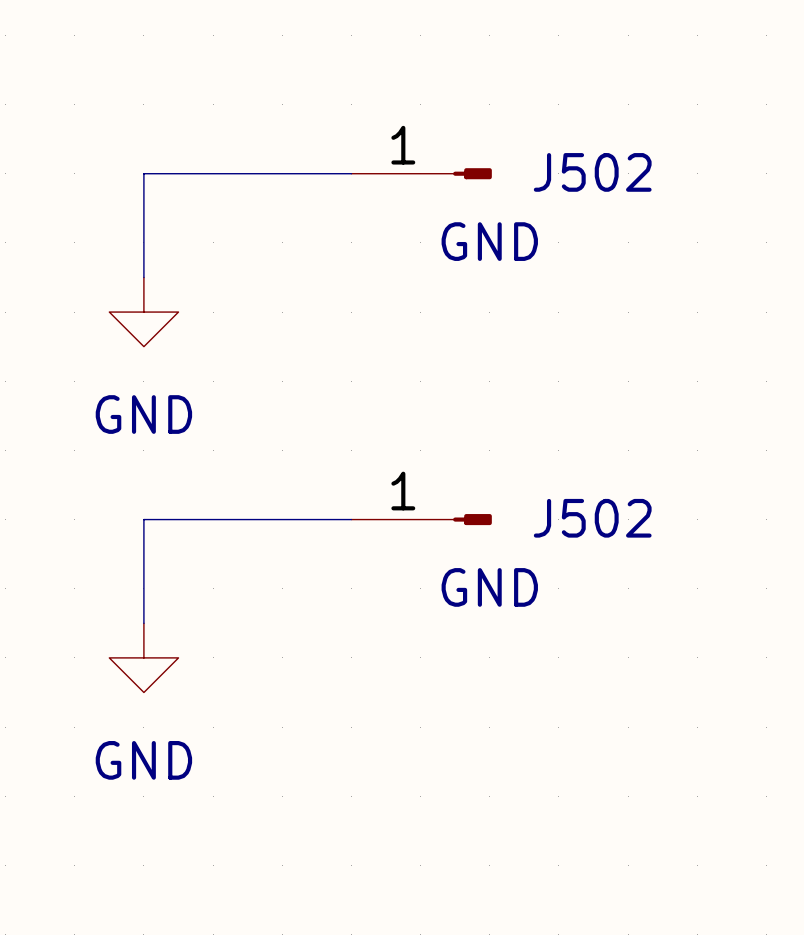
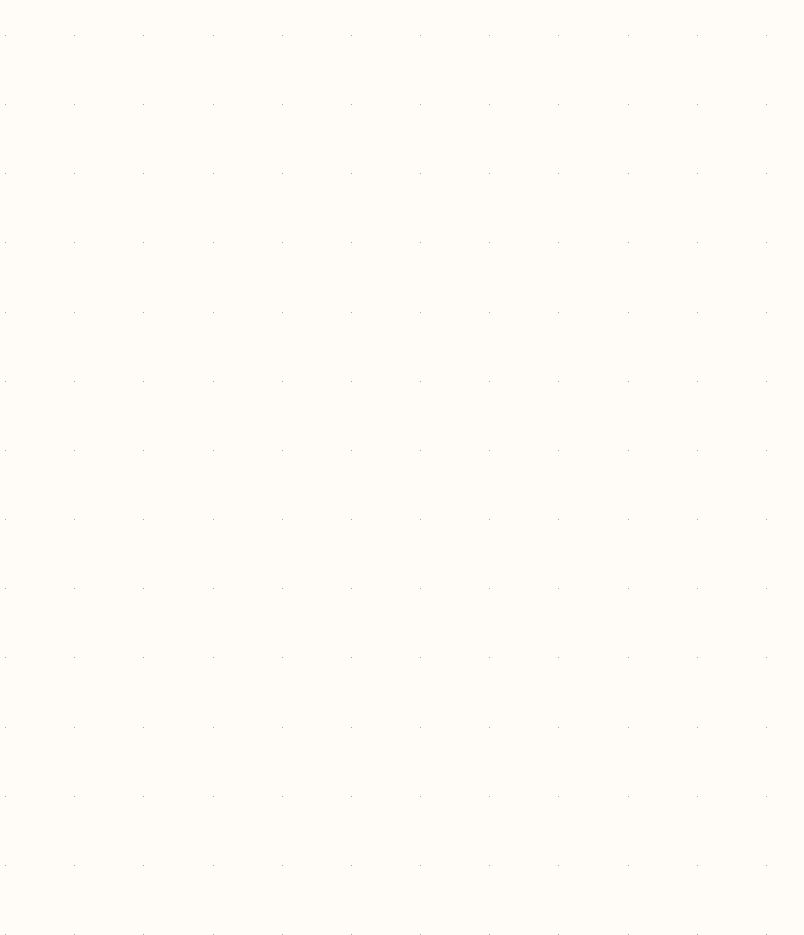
wire: (351, 173) (143, 173) (143, 277) -> none
J502: GND (421, 173) -> none
power symbol: GND (143, 312) -> none
wire: (351, 519) (143, 519) (143, 623) -> none
J502: GND (421, 519) -> none
power symbol: GND (143, 657) -> none

